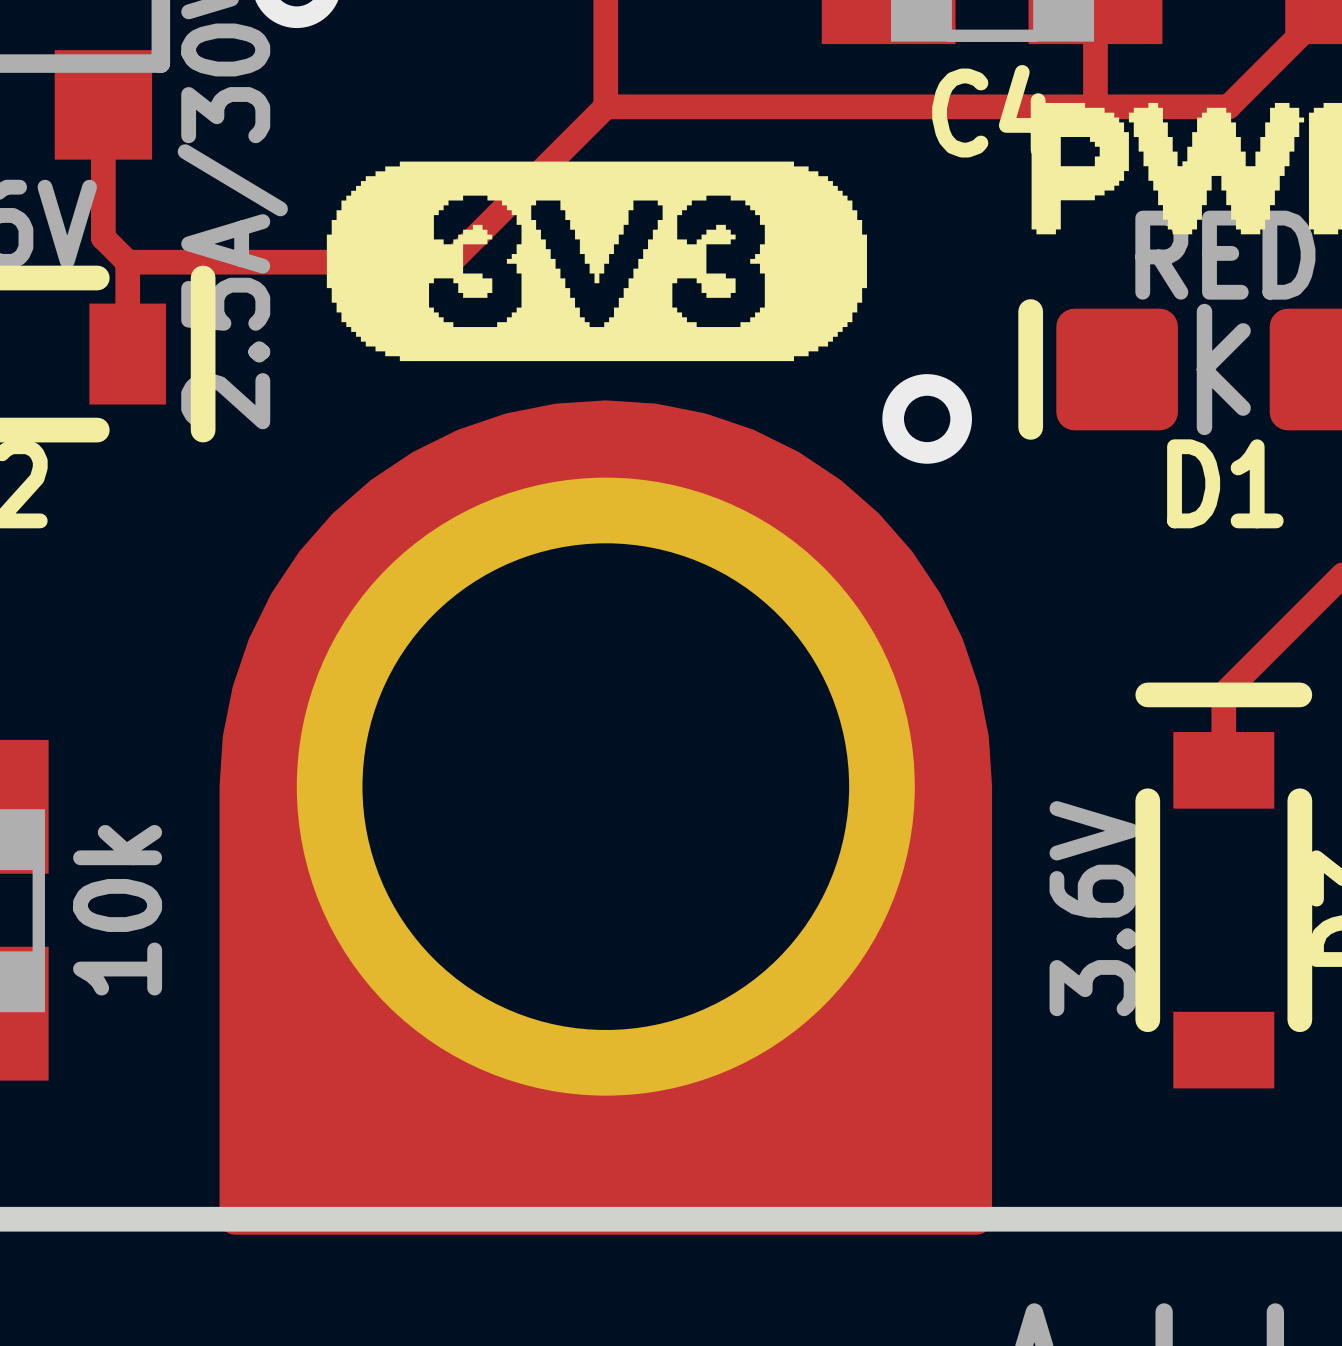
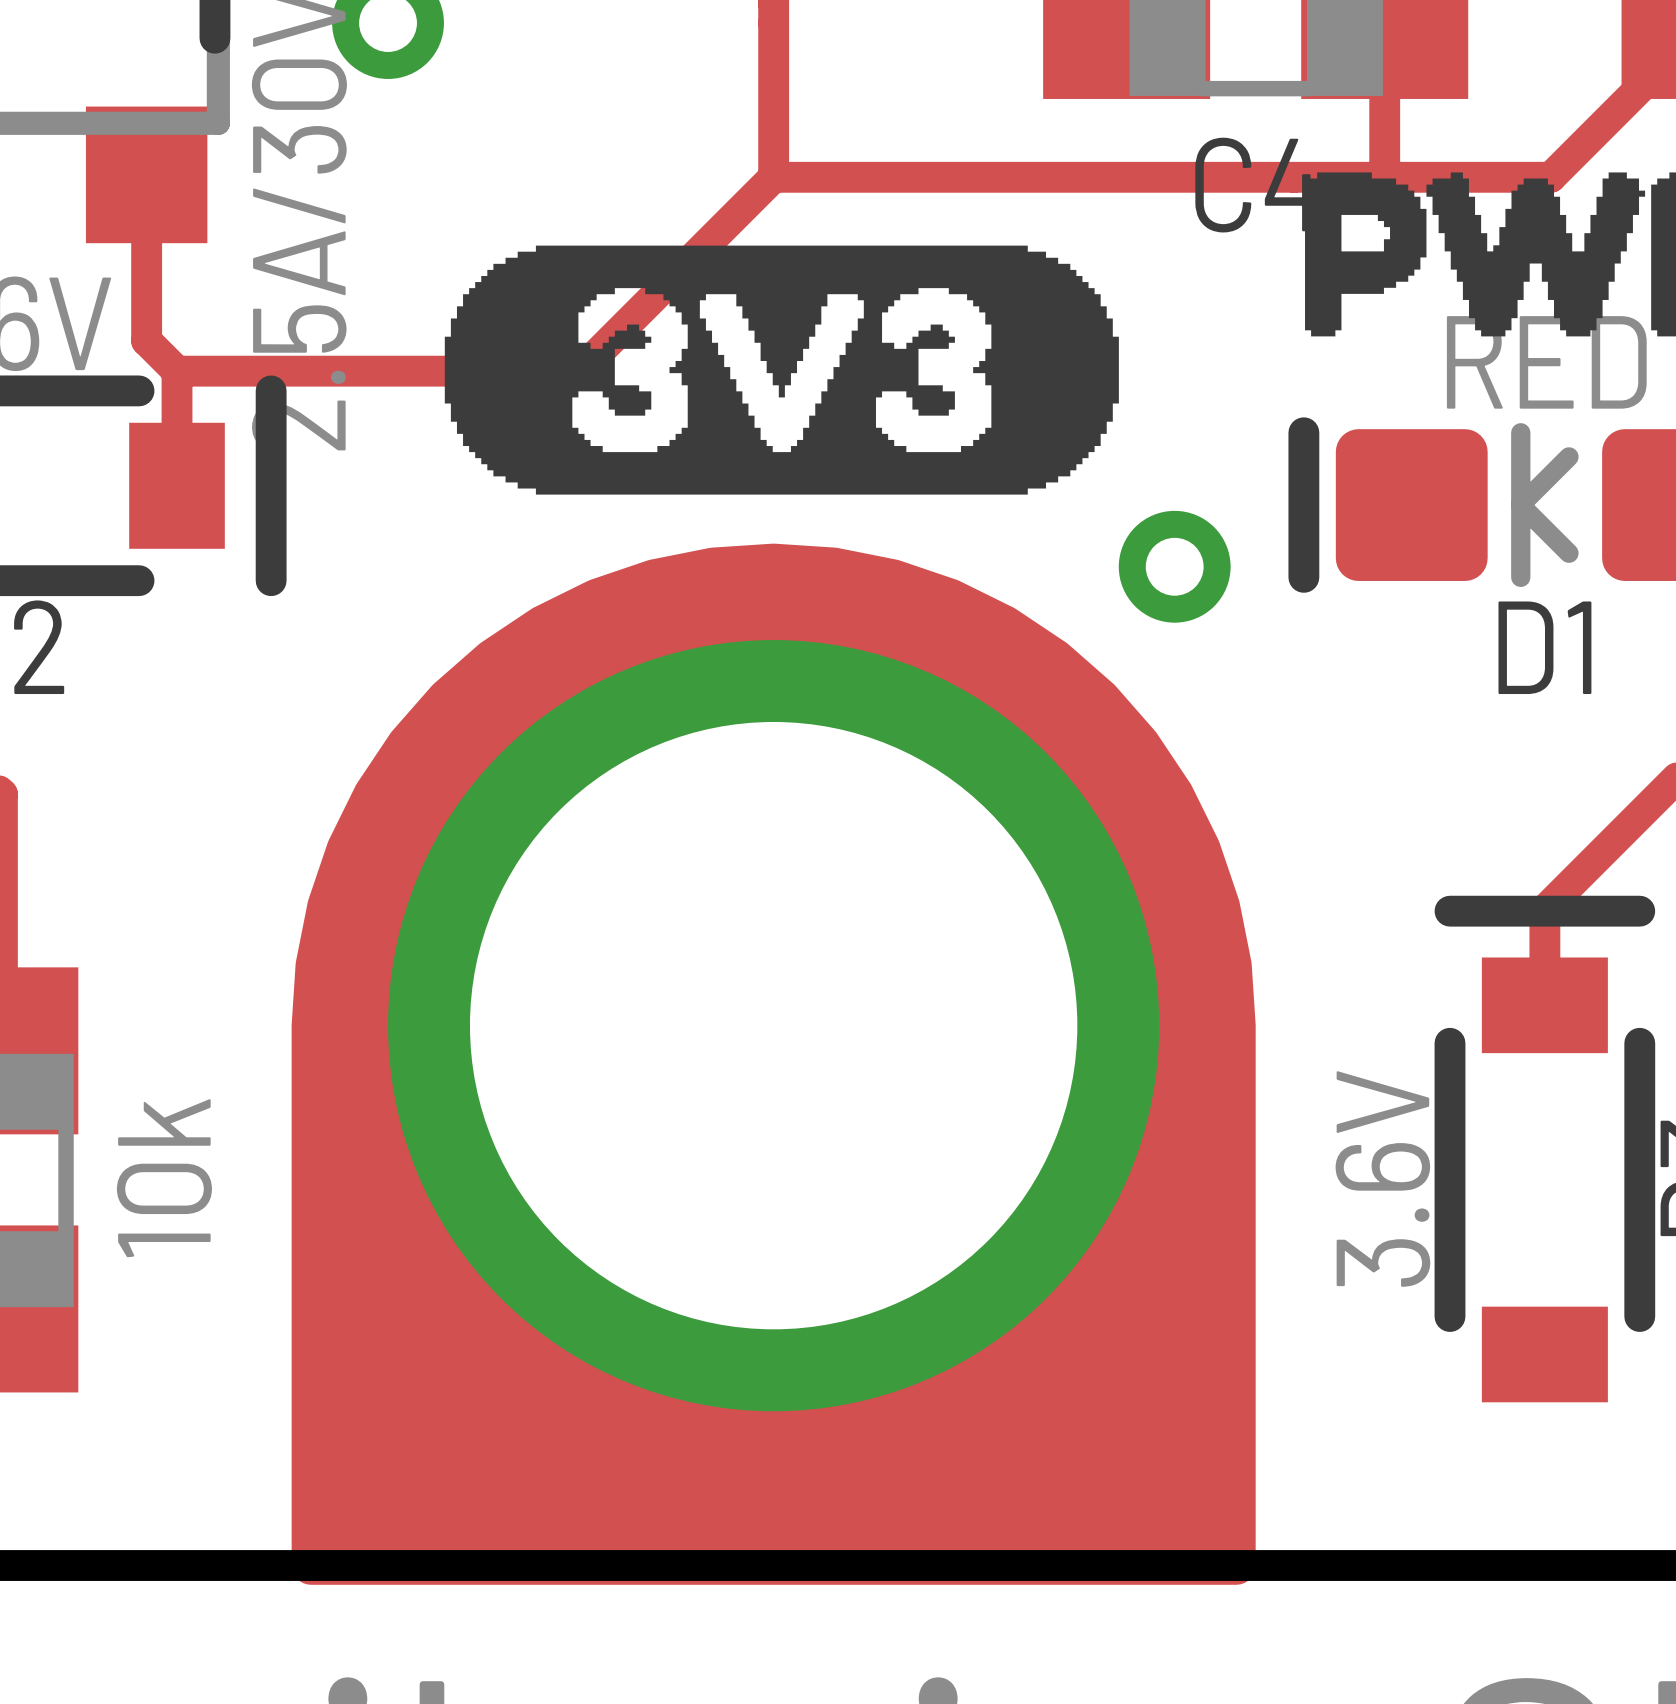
drawing position: (596, 261) -> (781, 370)

